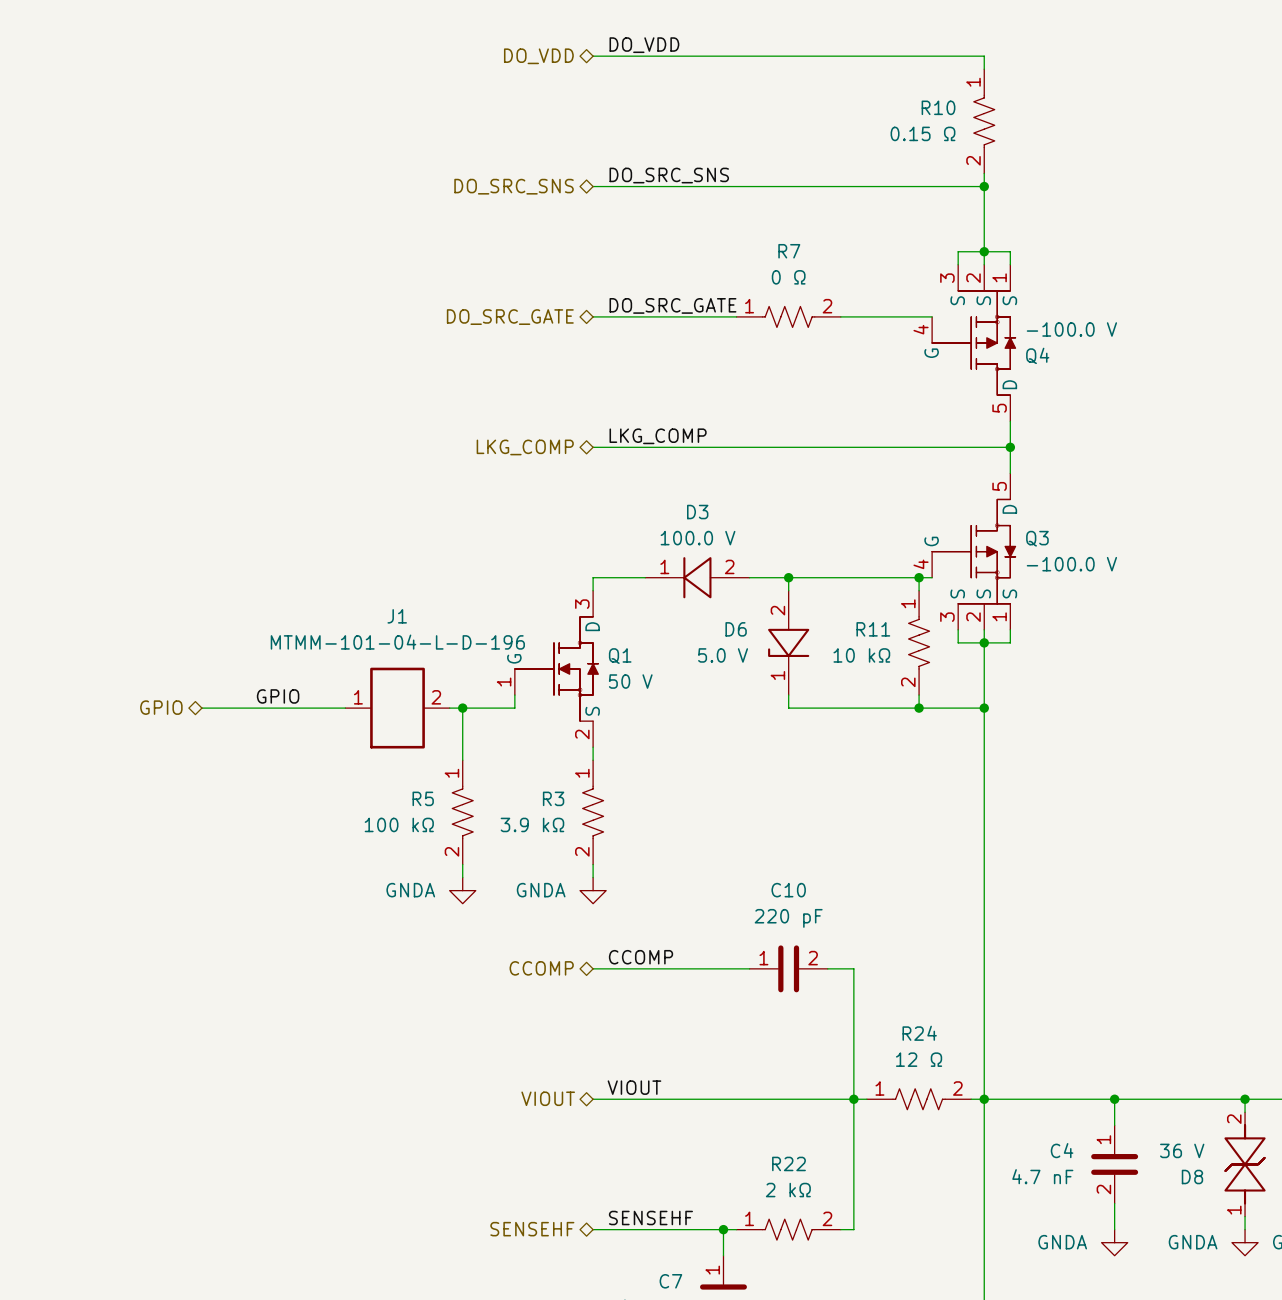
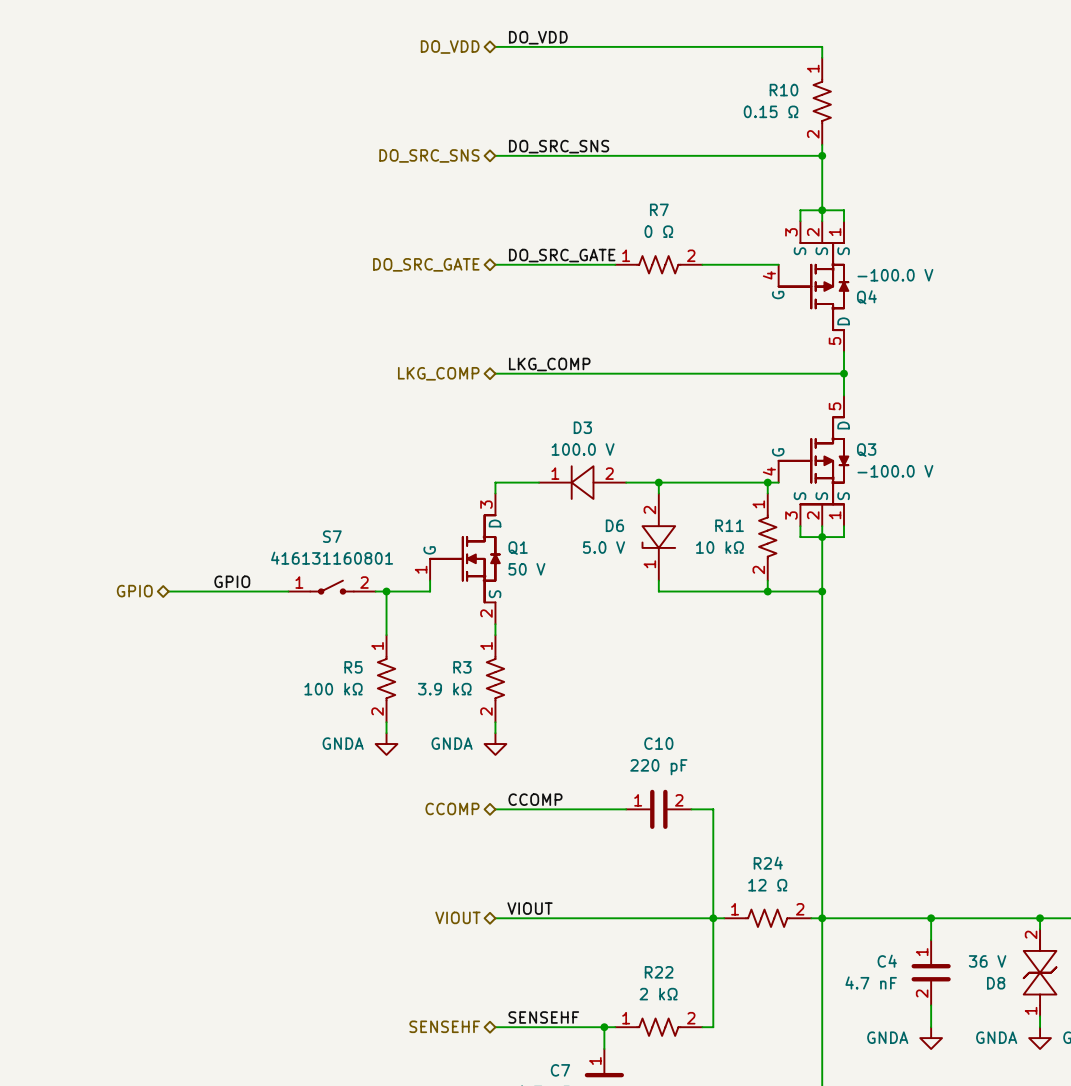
S7: none -> 416131160801 (332, 587)
J1: MTMM-101-04-L-D-196 (397, 708) -> none

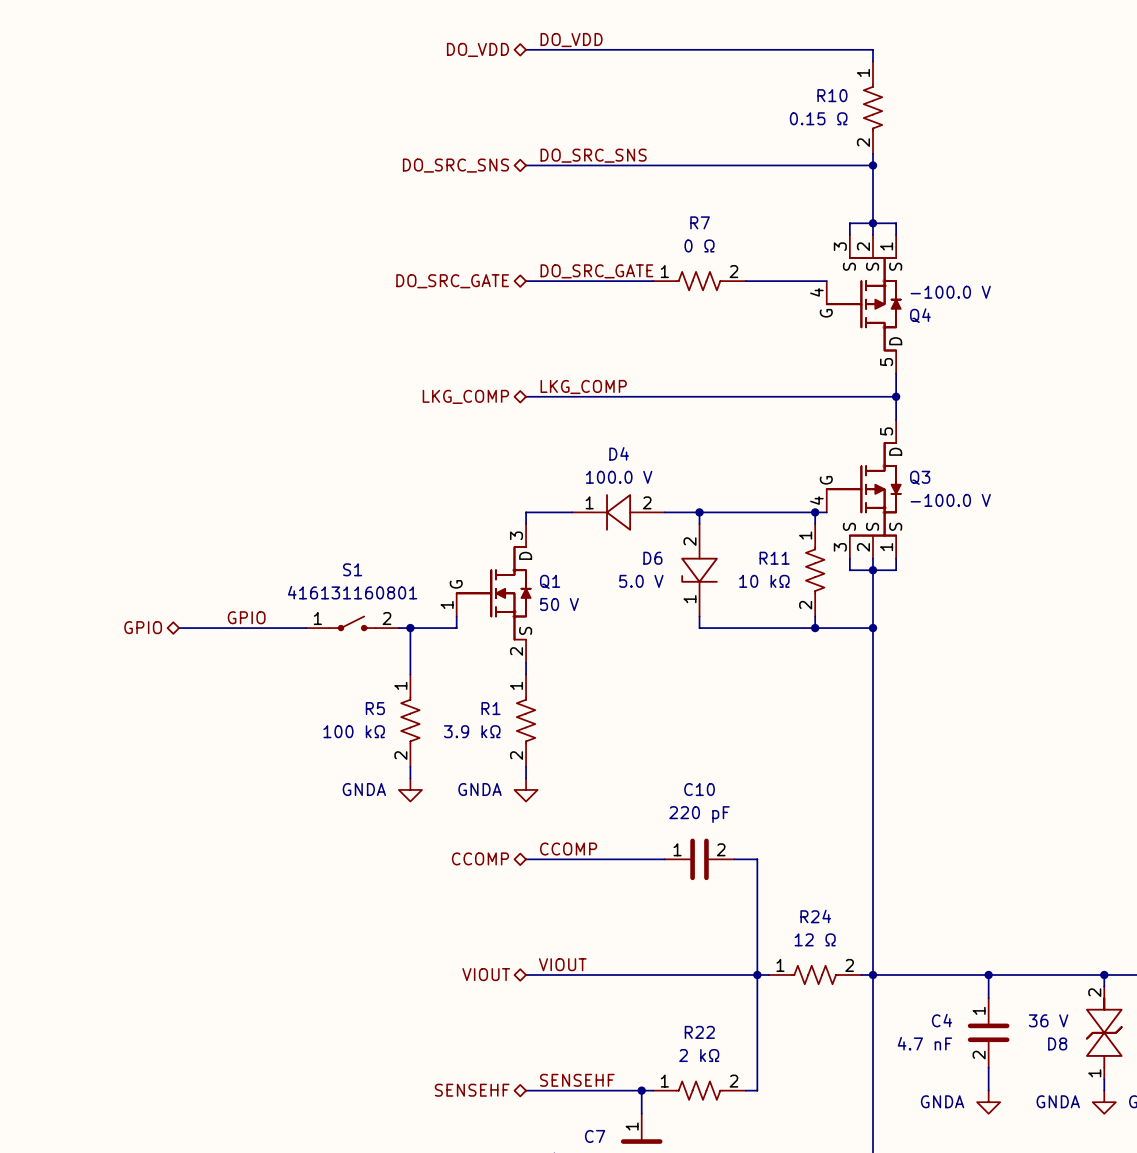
D3 name: D3 (582, 427) -> D4 (619, 453)
S7 name: S7 (332, 536) -> S1 (352, 569)
R3 name: R3 (462, 667) -> R1 (490, 708)

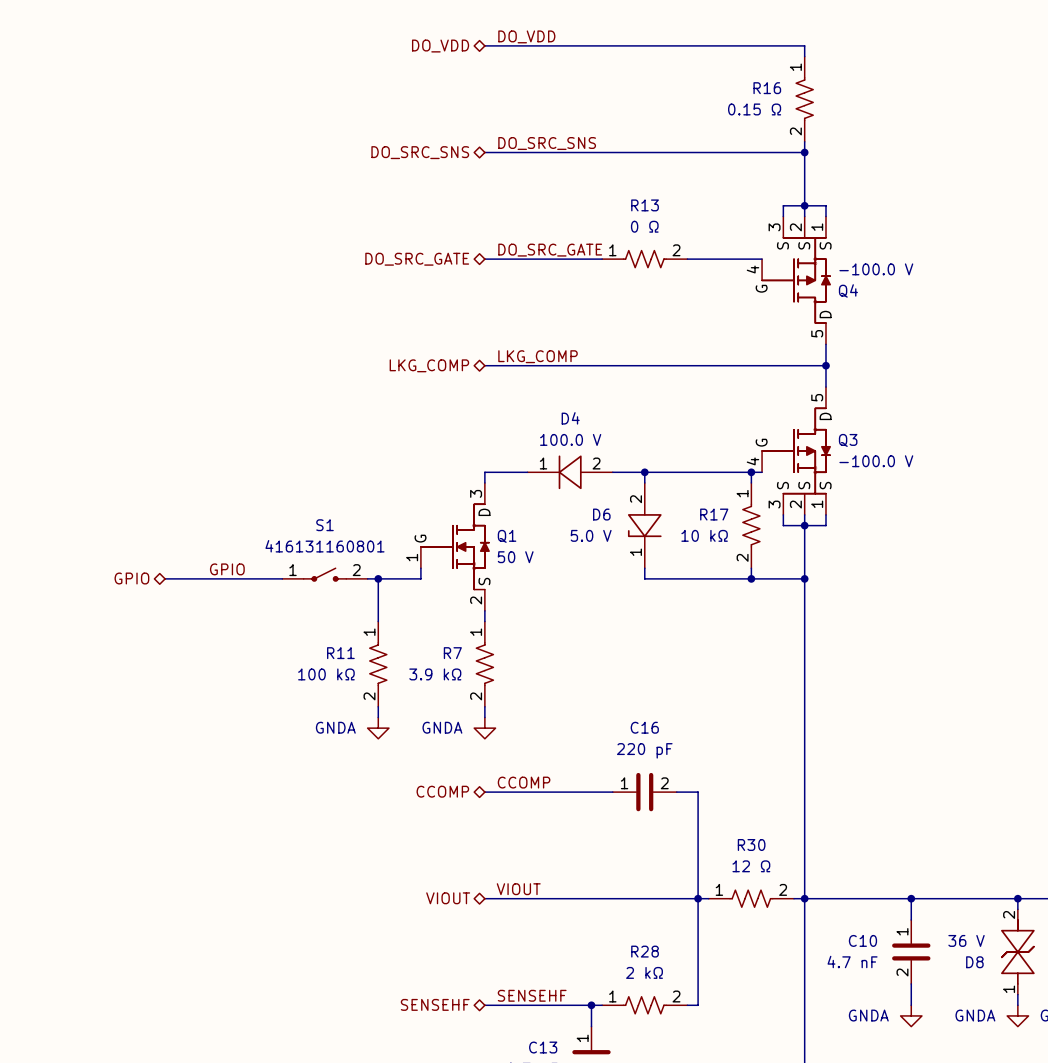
R10 name: R10 (832, 95) -> R16 (767, 88)
R7 name: R7 (700, 222) -> R13 (645, 205)
R11 name: R11 (774, 558) -> R17 (714, 514)
R5 name: R5 (375, 708) -> R11 (340, 653)
R1 name: R1 (490, 708) -> R7 (452, 653)
C10 name: C10 (699, 789) -> C16 (644, 727)
R24 name: R24 (815, 916) -> R30 (751, 845)
C4 name: C4 (942, 1020) -> C10 (862, 940)
R22 name: R22 (699, 1032) -> R28 (645, 951)
C7 name: C7 (595, 1136) -> C13 (543, 1047)

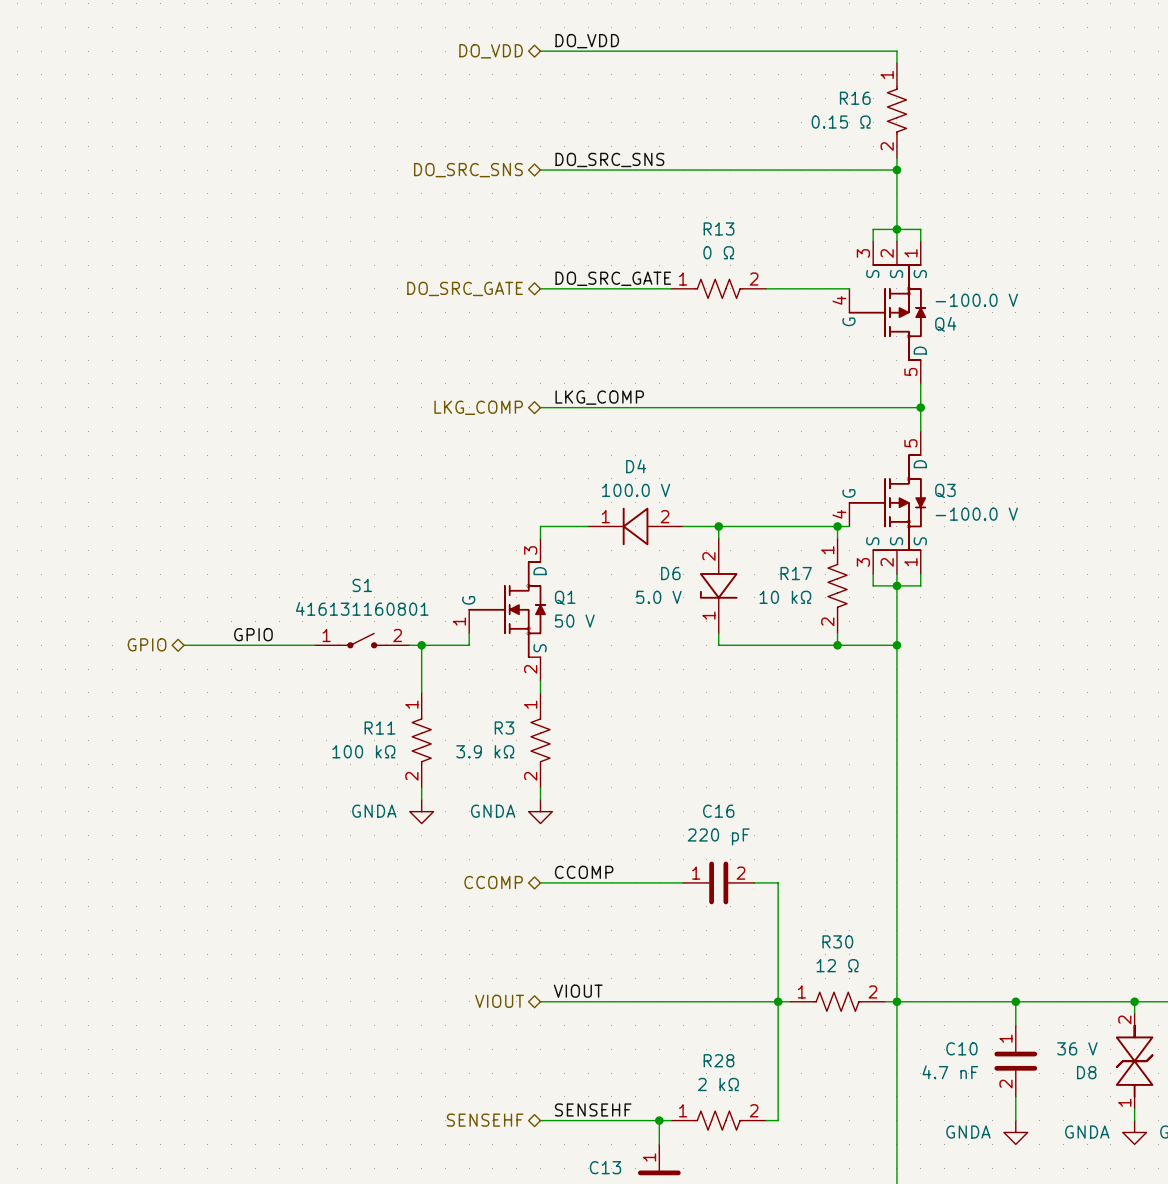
R7 name: R7 (452, 653) -> R3 (504, 728)

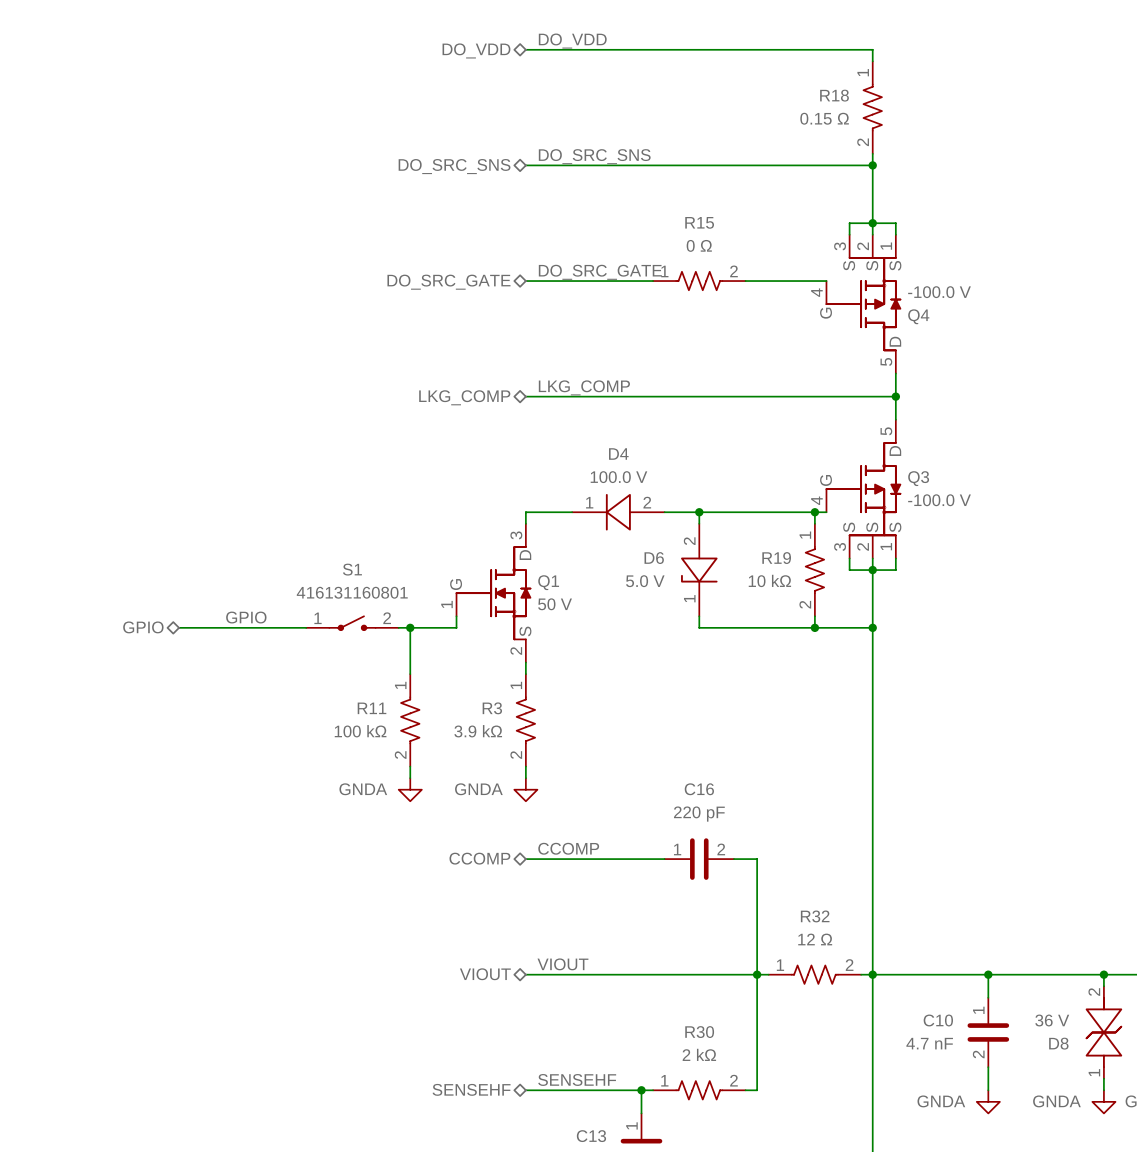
R16 name: R16 (855, 98) -> R18 (834, 95)
R13 name: R13 (719, 228) -> R15 (699, 222)
R17 name: R17 (796, 573) -> R19 (776, 558)
R30 name: R30 (837, 941) -> R32 (815, 916)
R28 name: R28 (719, 1060) -> R30 (699, 1032)

